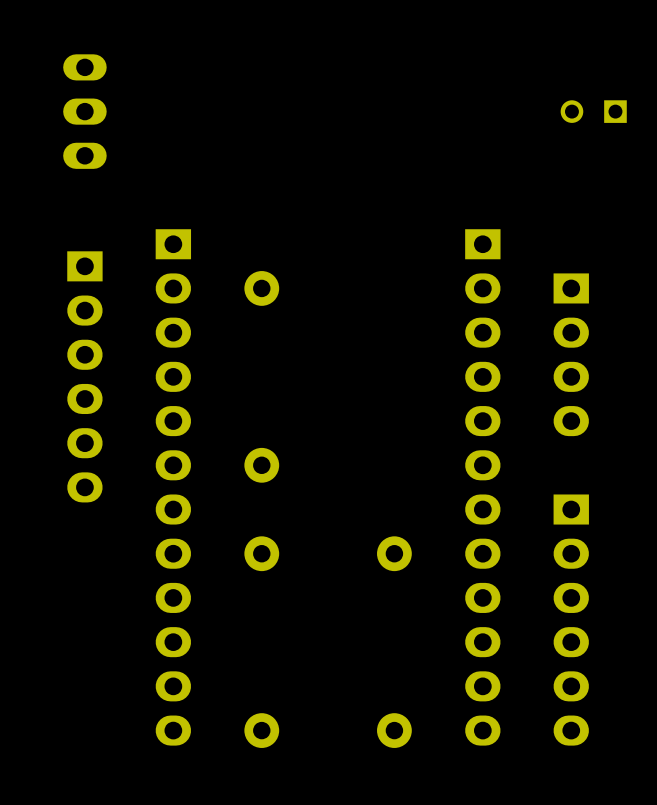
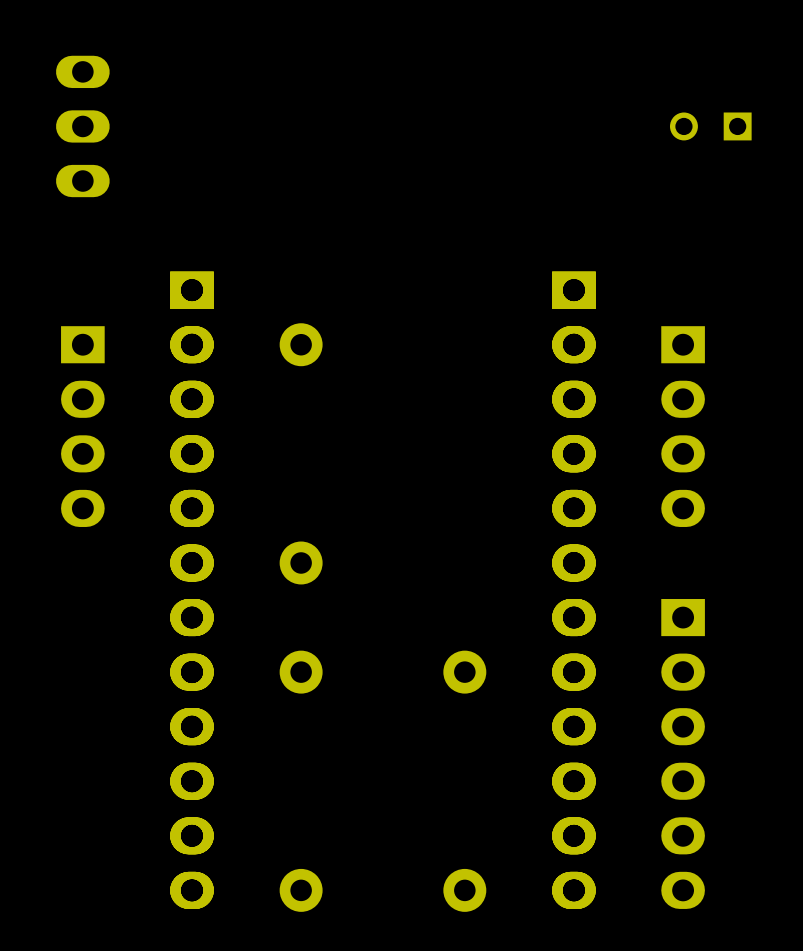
part: none -> (82, 426)
part: (84, 376) -> none
part: none -> (191, 590)
part: none -> (573, 590)

